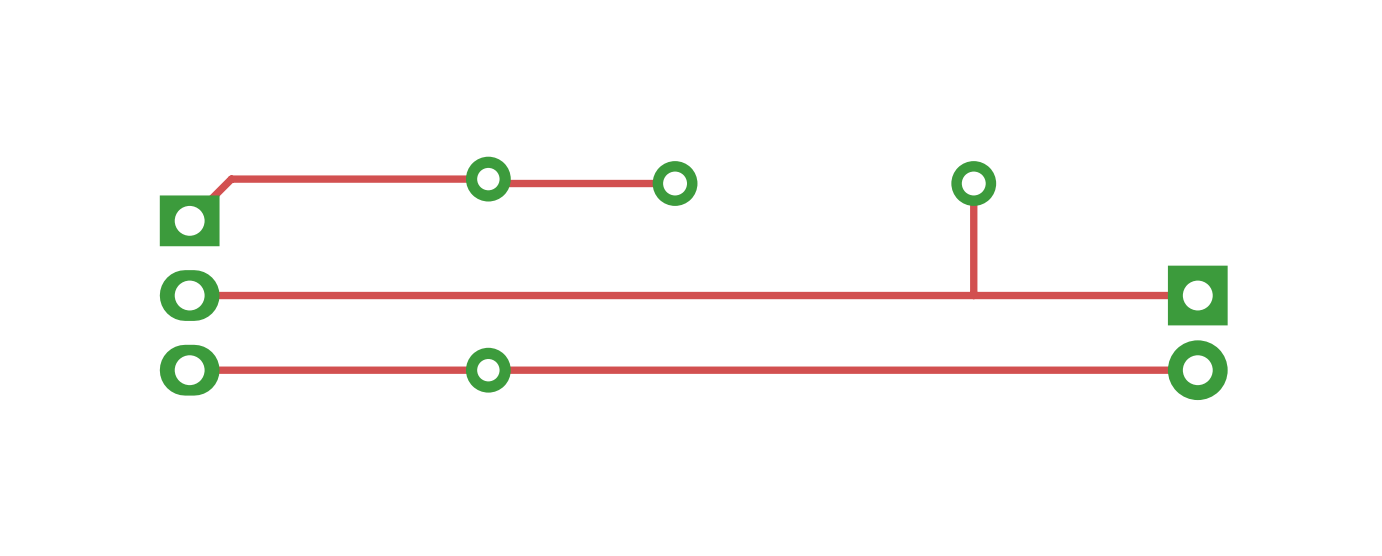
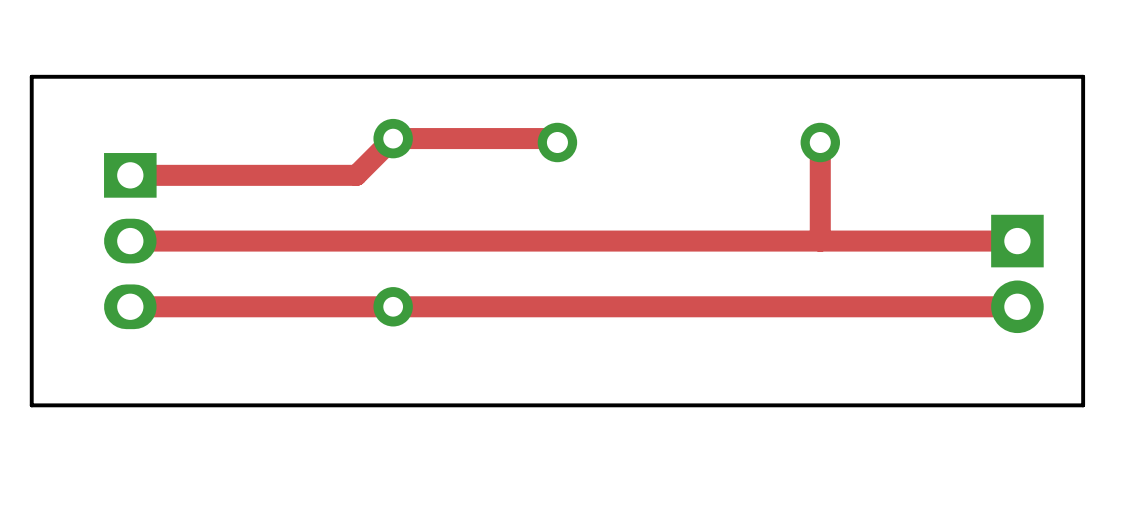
board edge: none -> (1083, 76) (1083, 405) (31, 405) (31, 76) (1083, 76)
top track: (488, 179) (231, 179) (189, 220) -> (557, 138) (393, 138) (356, 175) (130, 175)
top track width: thin (973, 183) (973, 295) -> thick (820, 142) (820, 241)
top track width: thin (1197, 295) (189, 295) -> thick (1017, 241) (130, 241)
top track width: thin (1197, 370) (189, 370) -> thick (1017, 306) (130, 306)

